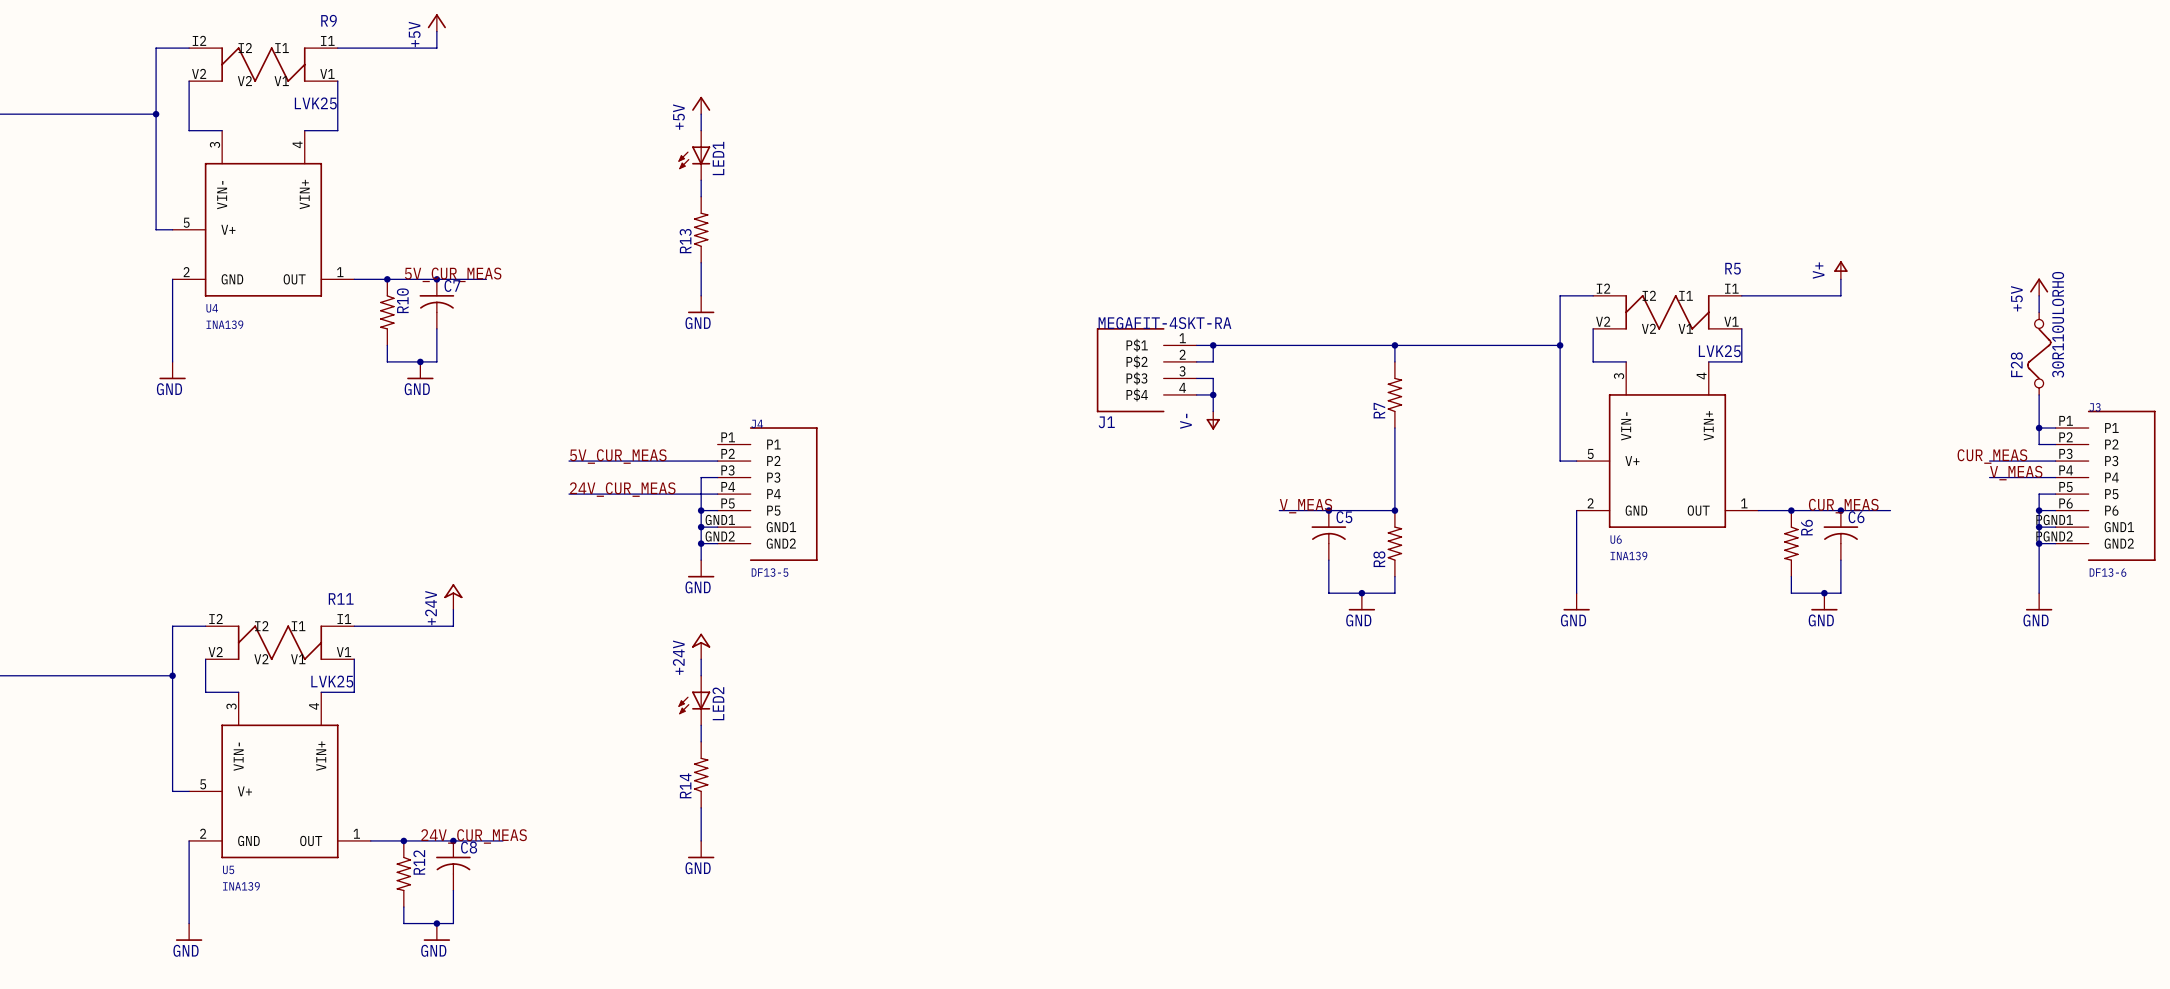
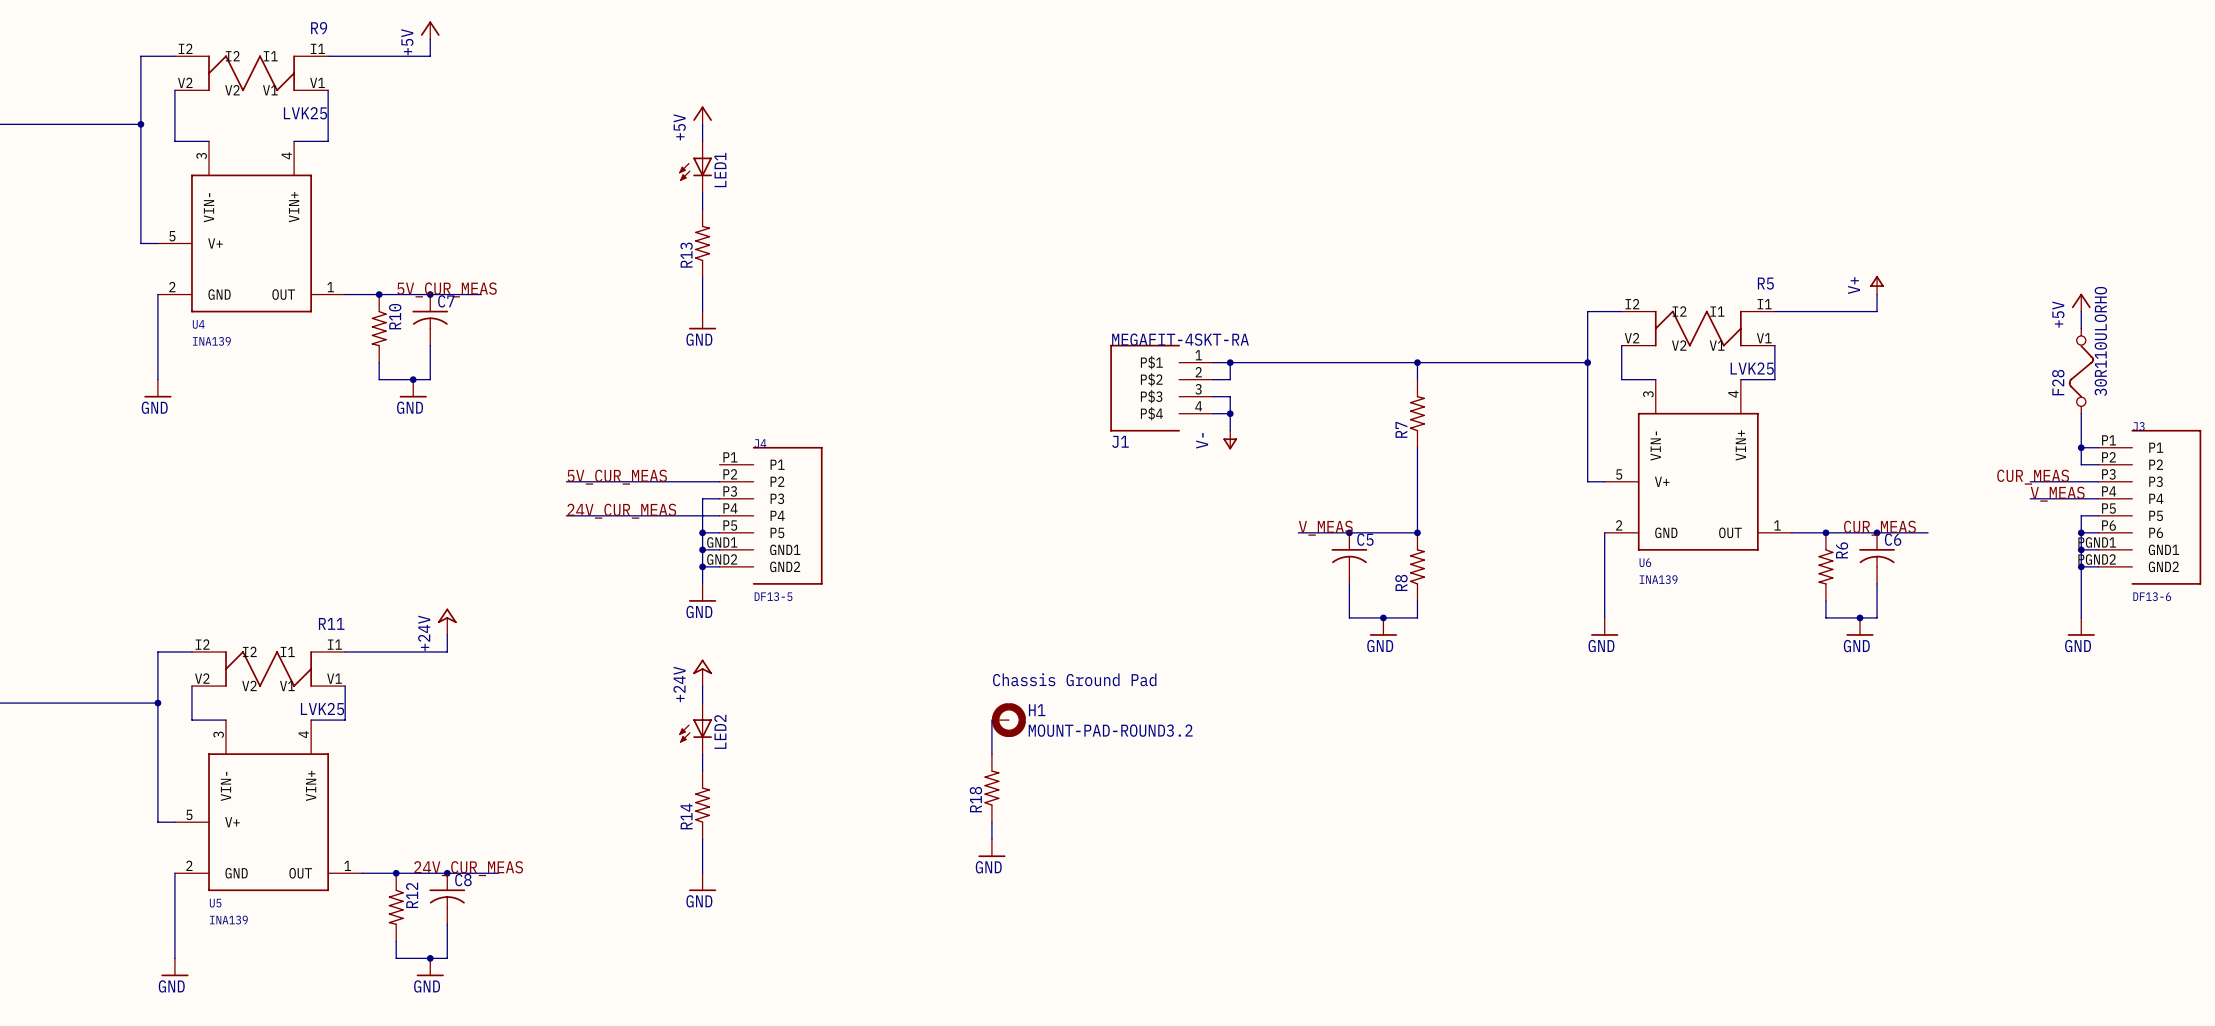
text: none -> Chassis Ground Pad (1074, 679)
wire: none -> (991, 720) (991, 754)
H1: none -> MOUNT-PAD-ROUND3.2 (1008, 720)
R18: none -> (991, 788)
wire: none -> (991, 822) (991, 839)
power symbol: none -> GND (991, 848)

